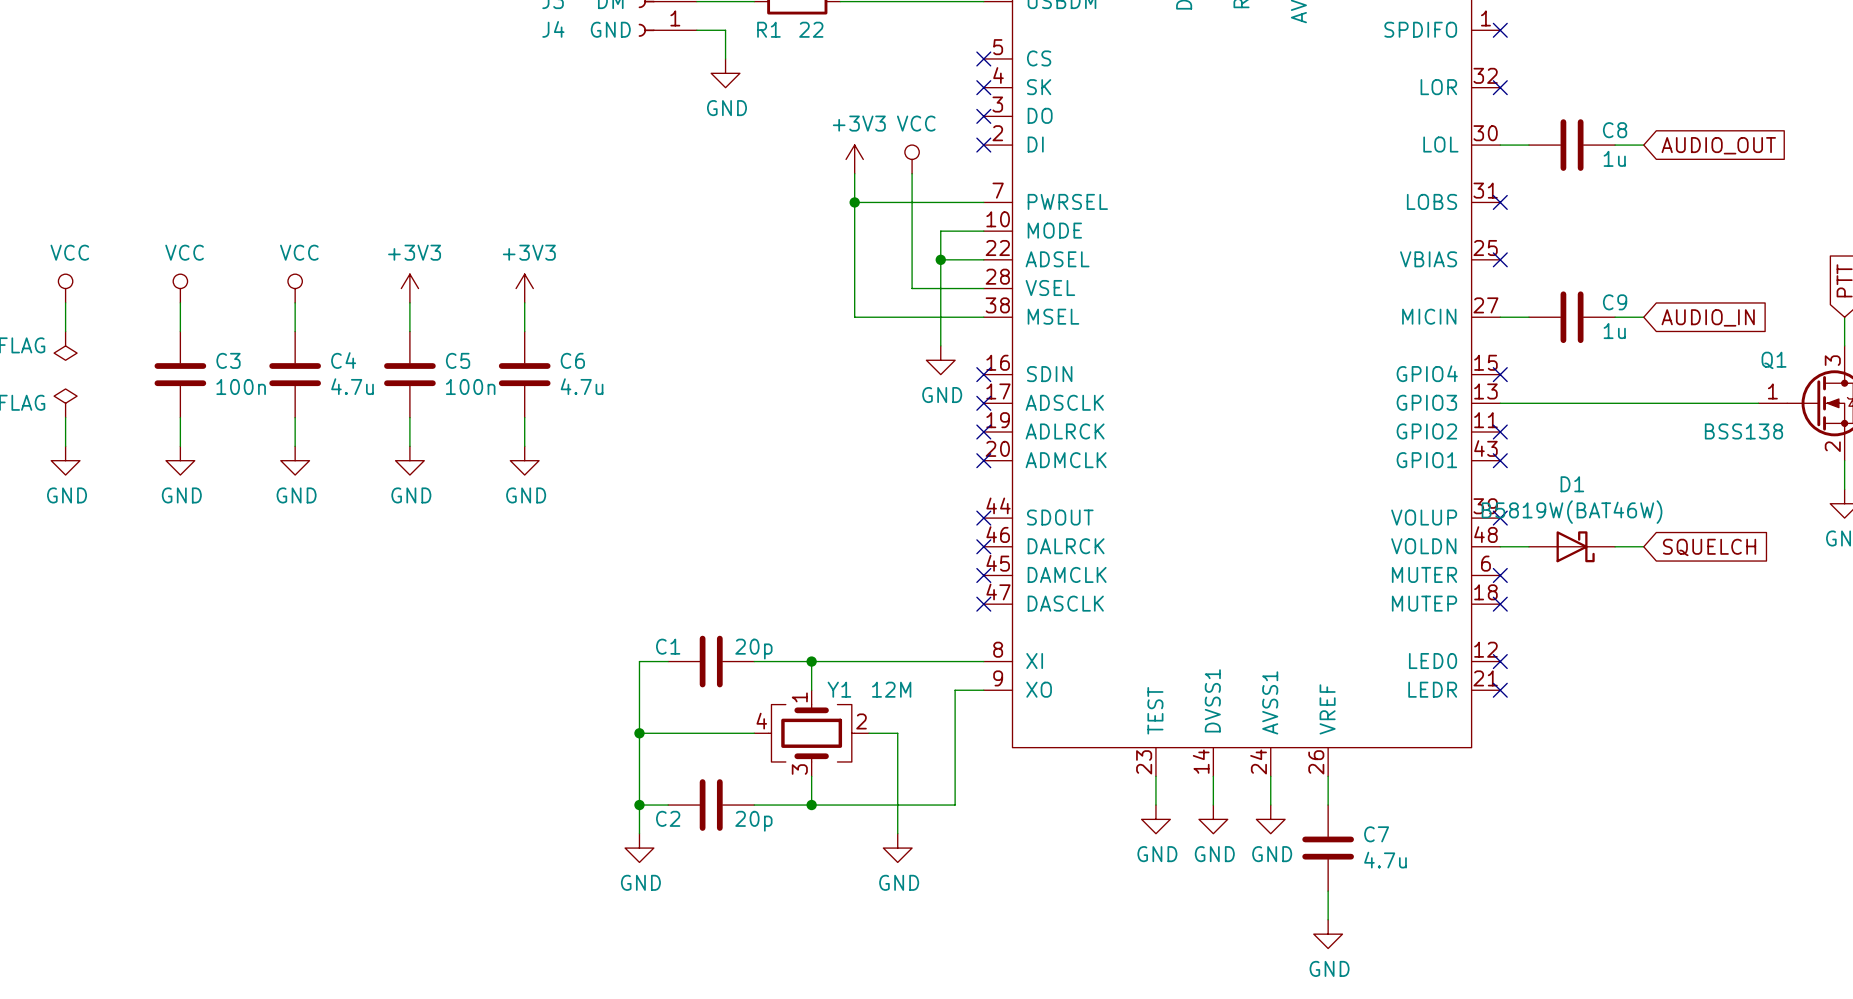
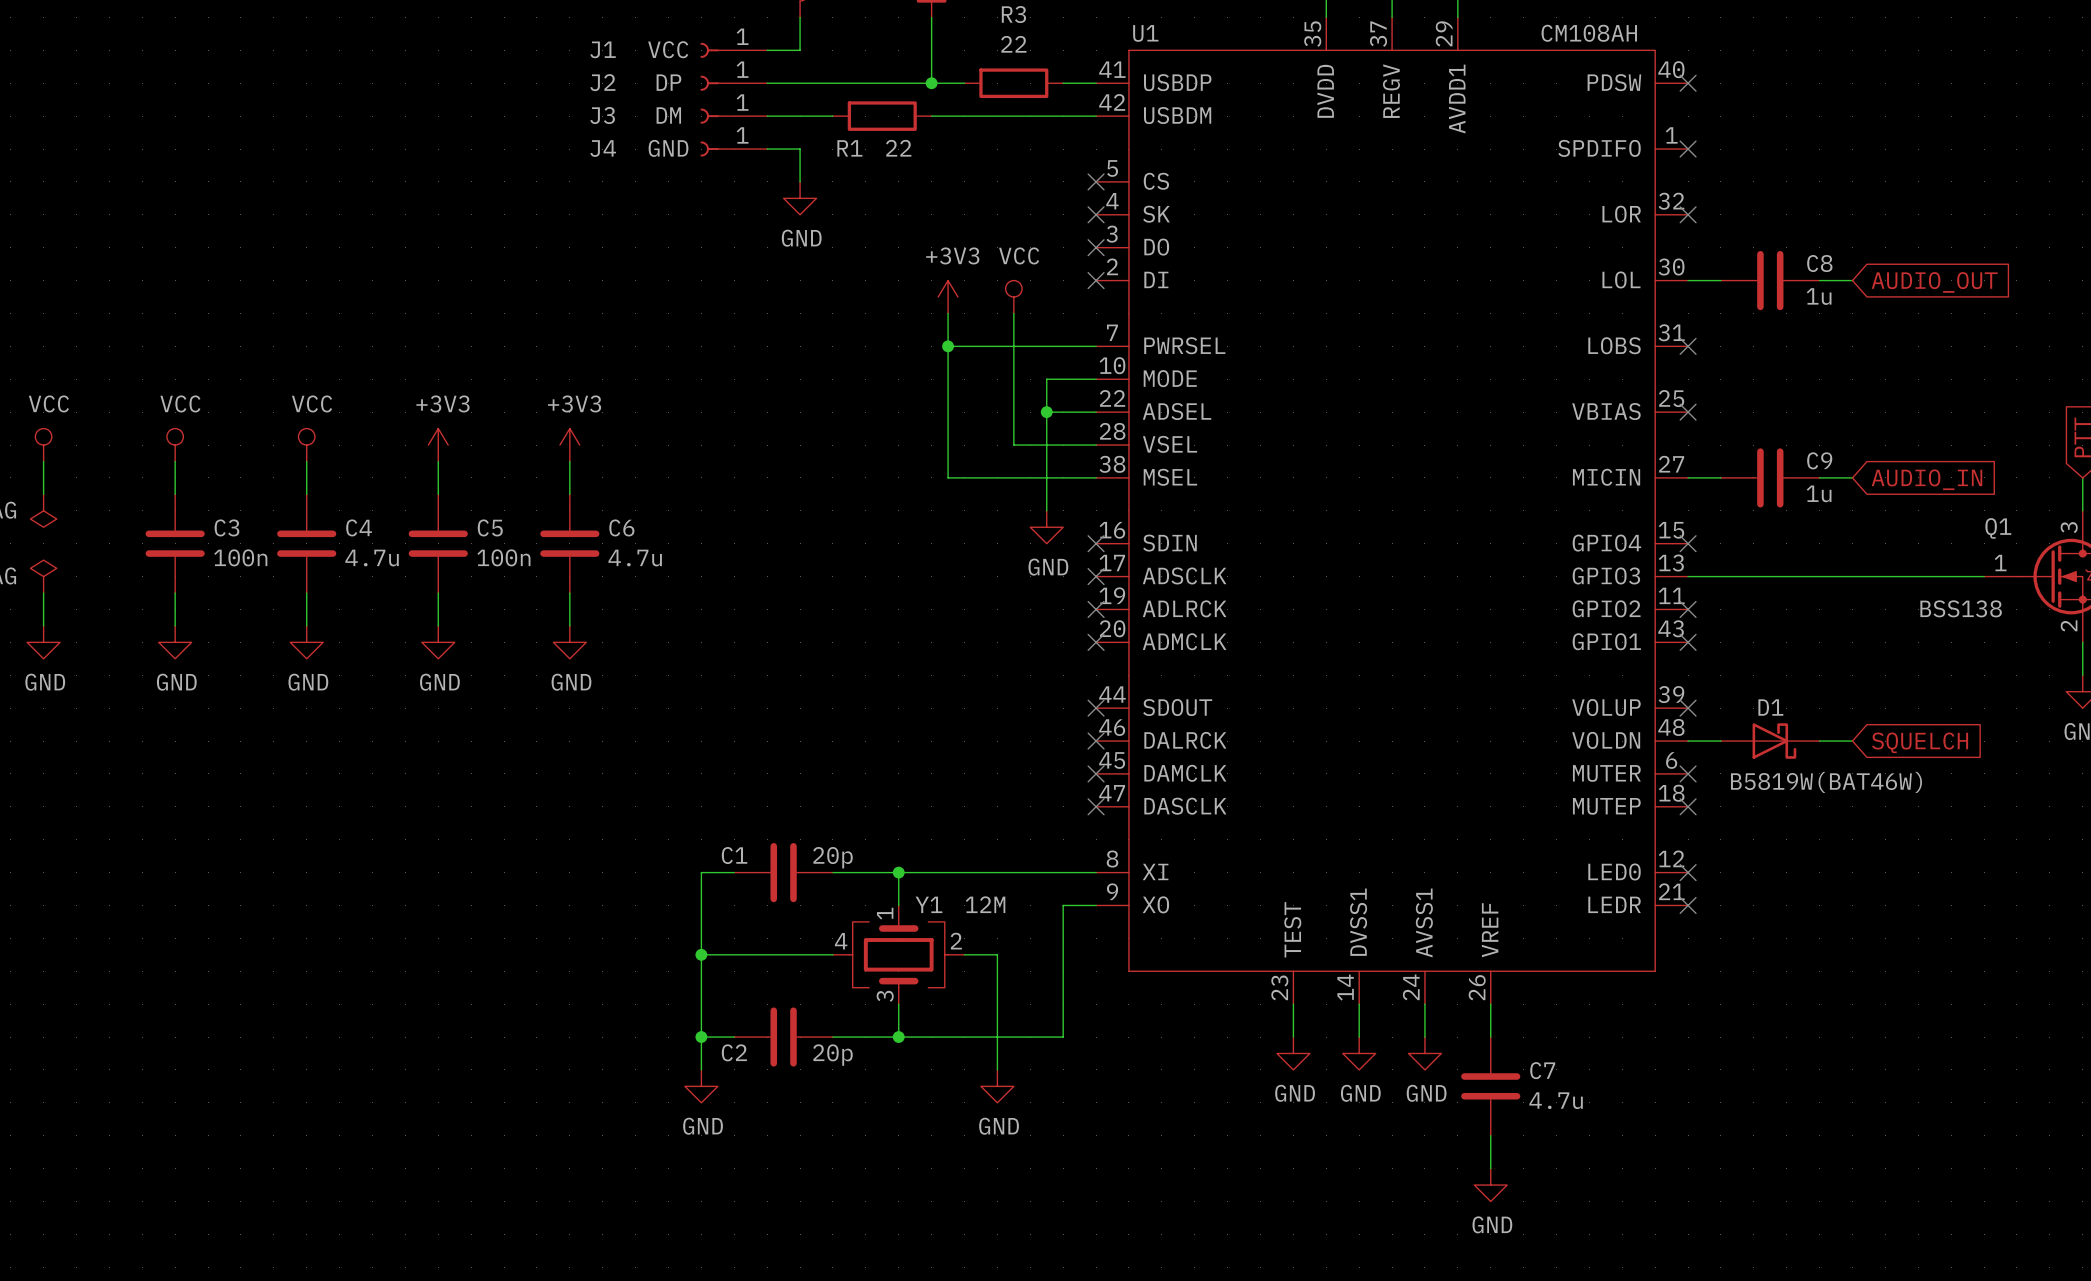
D1 name position: D1 (1572, 484) -> D1 (1770, 707)
D1 value position: B5819W(BAT46W) (1572, 512) -> B5819W(BAT46W) (1826, 782)

